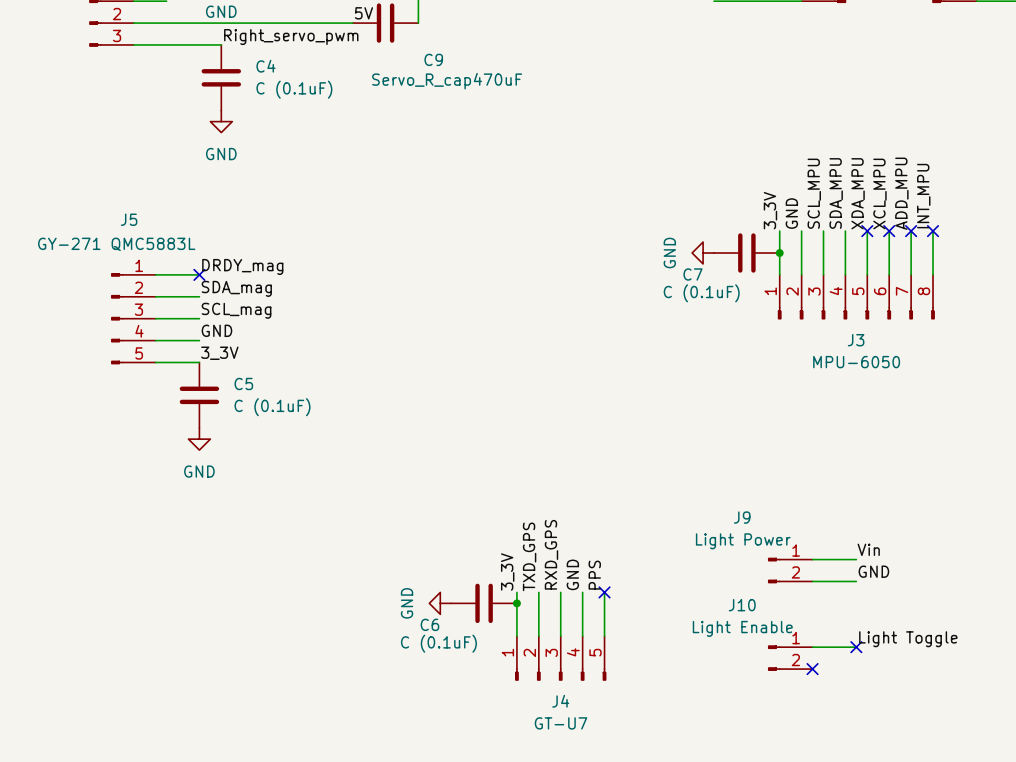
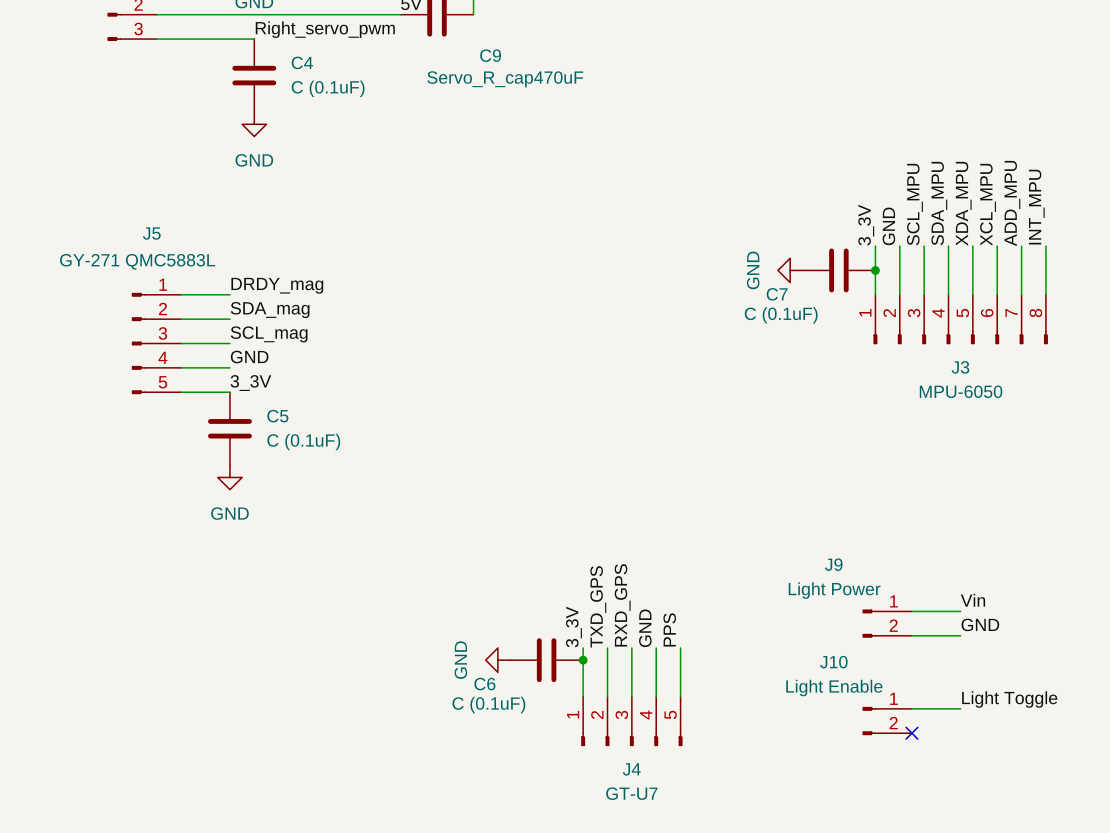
no-connect mark: (867, 231) -> none
no-connect mark: (889, 231) -> none
no-connect mark: (911, 231) -> none
no-connect mark: (933, 231) -> none
no-connect mark: (199, 274) -> none
no-connect mark: (604, 592) -> none
no-connect mark: (856, 647) -> none

